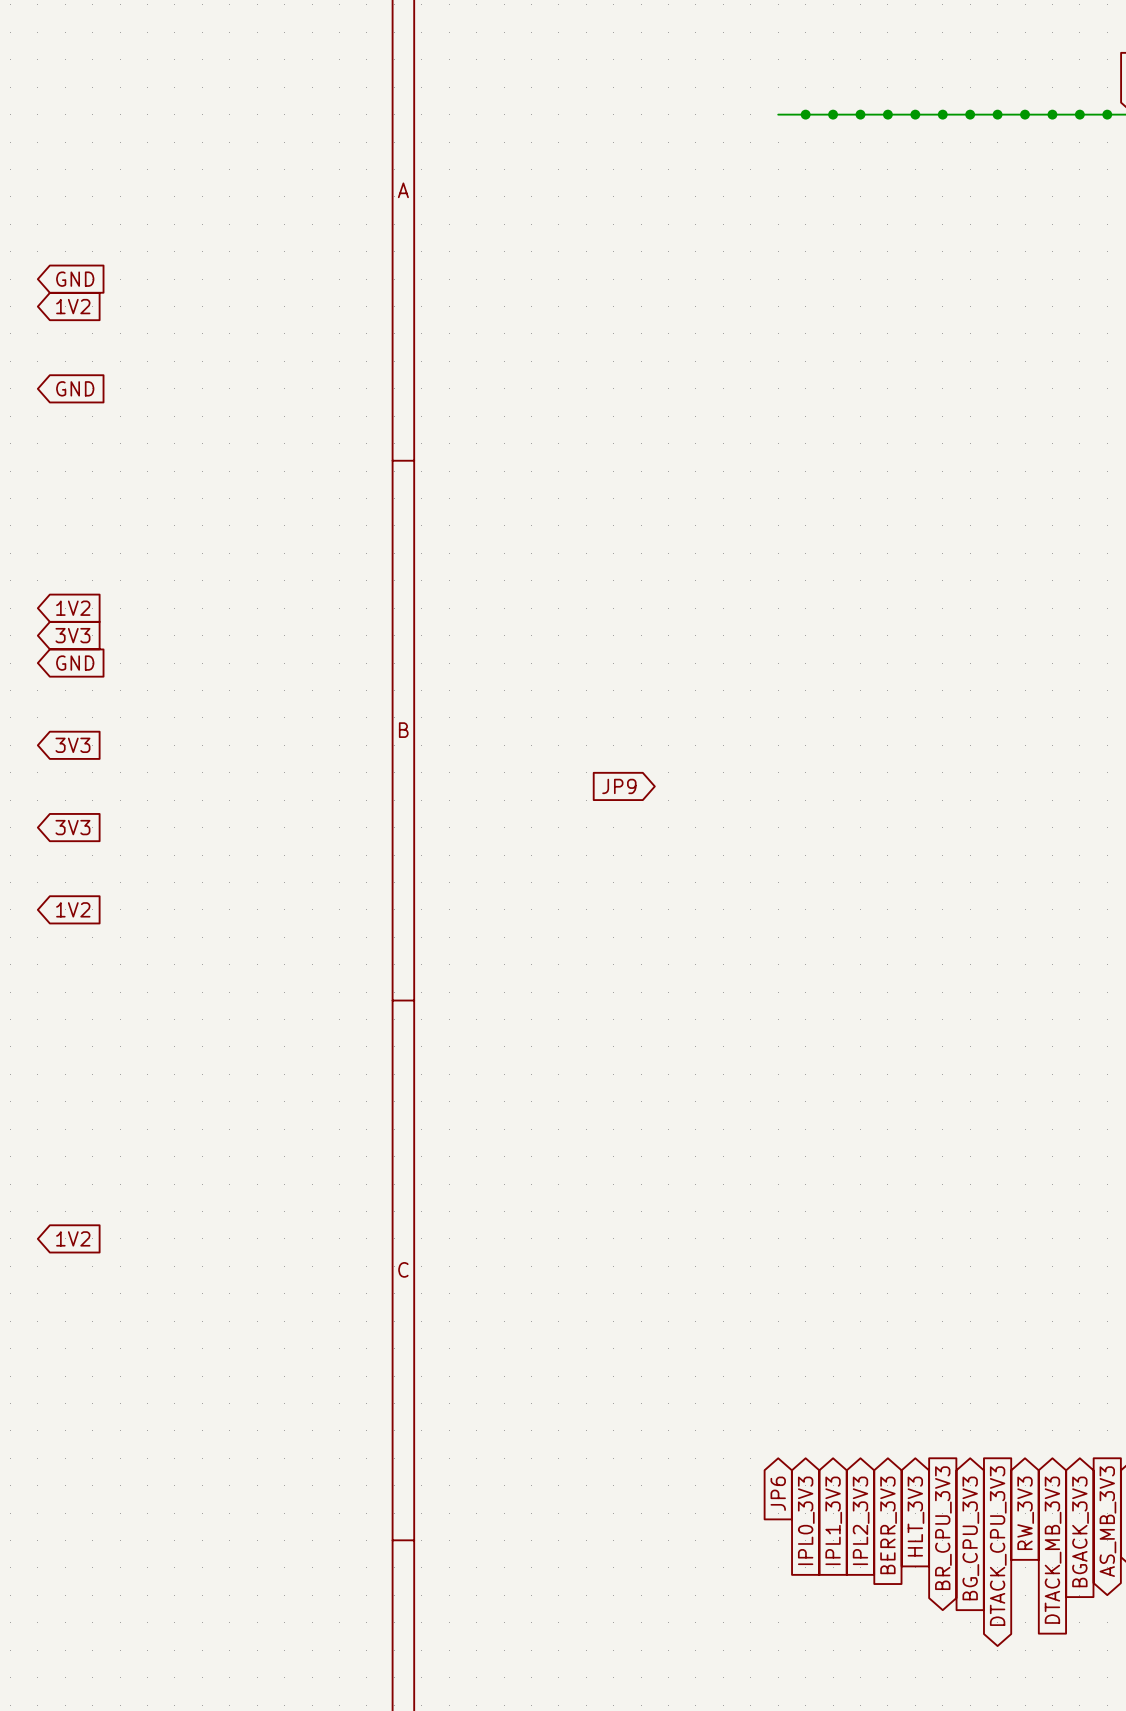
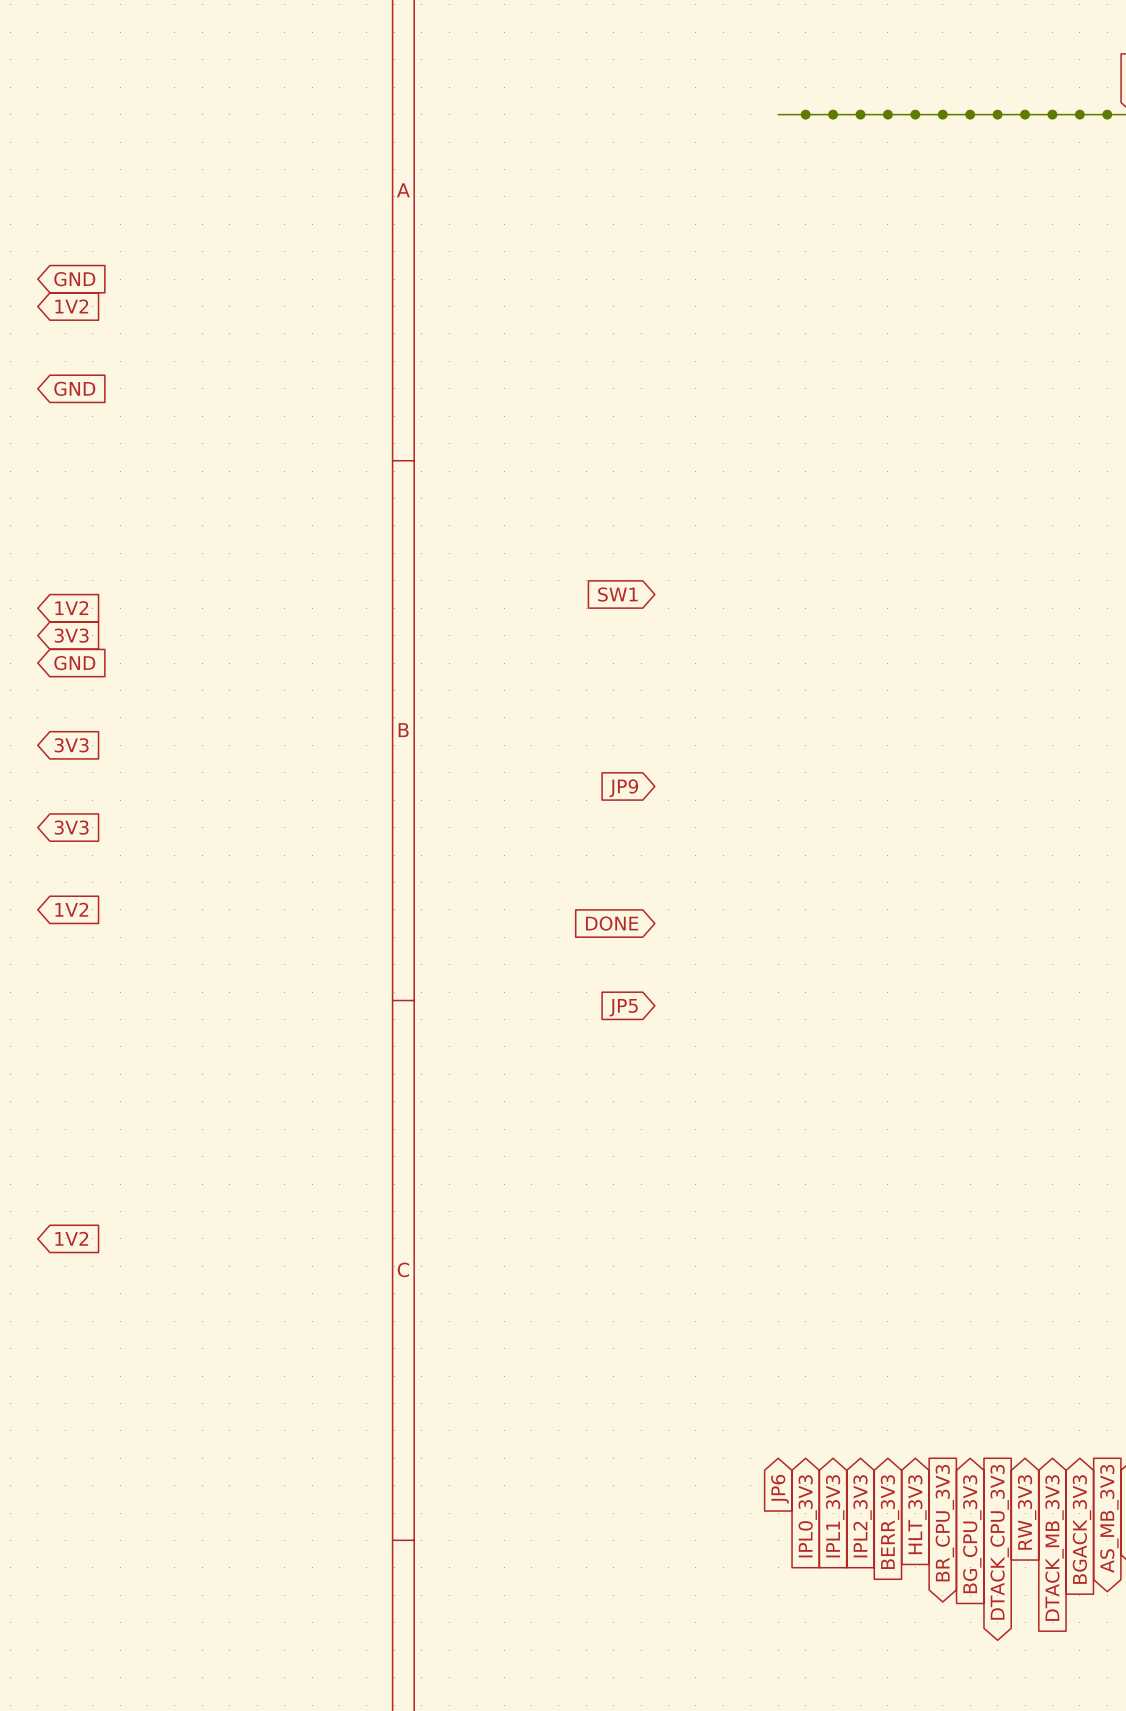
global label: none -> SW1 (617, 594)
global label: none -> DONE (612, 923)
global label: none -> JP5 (623, 1007)

